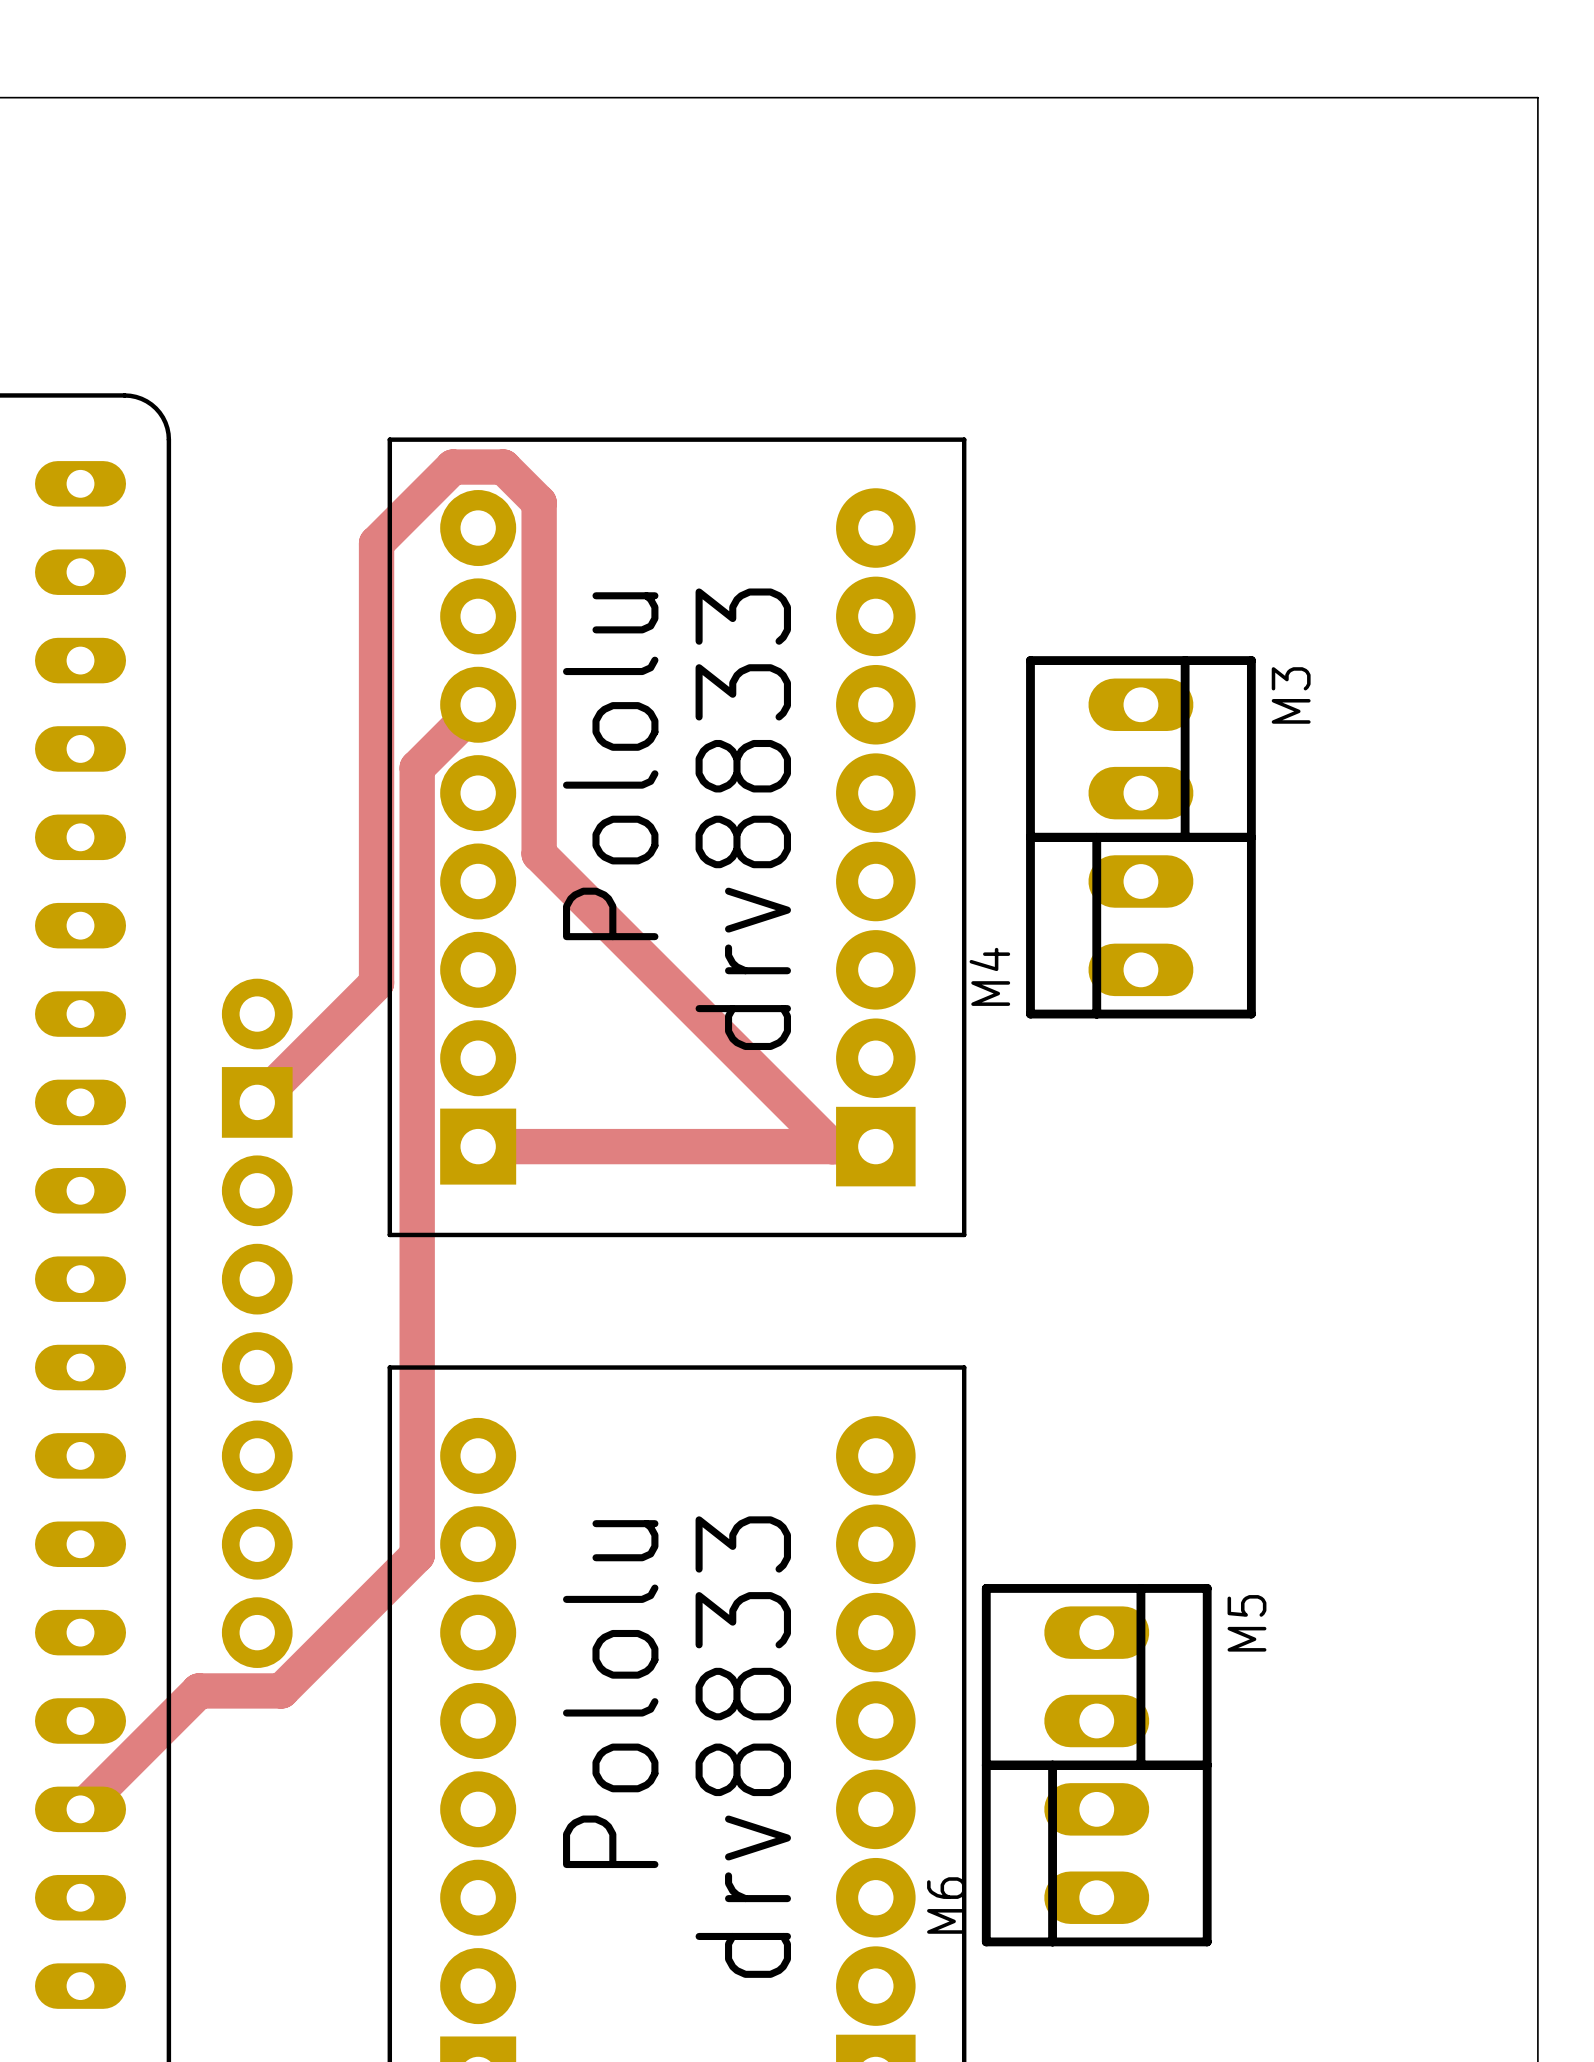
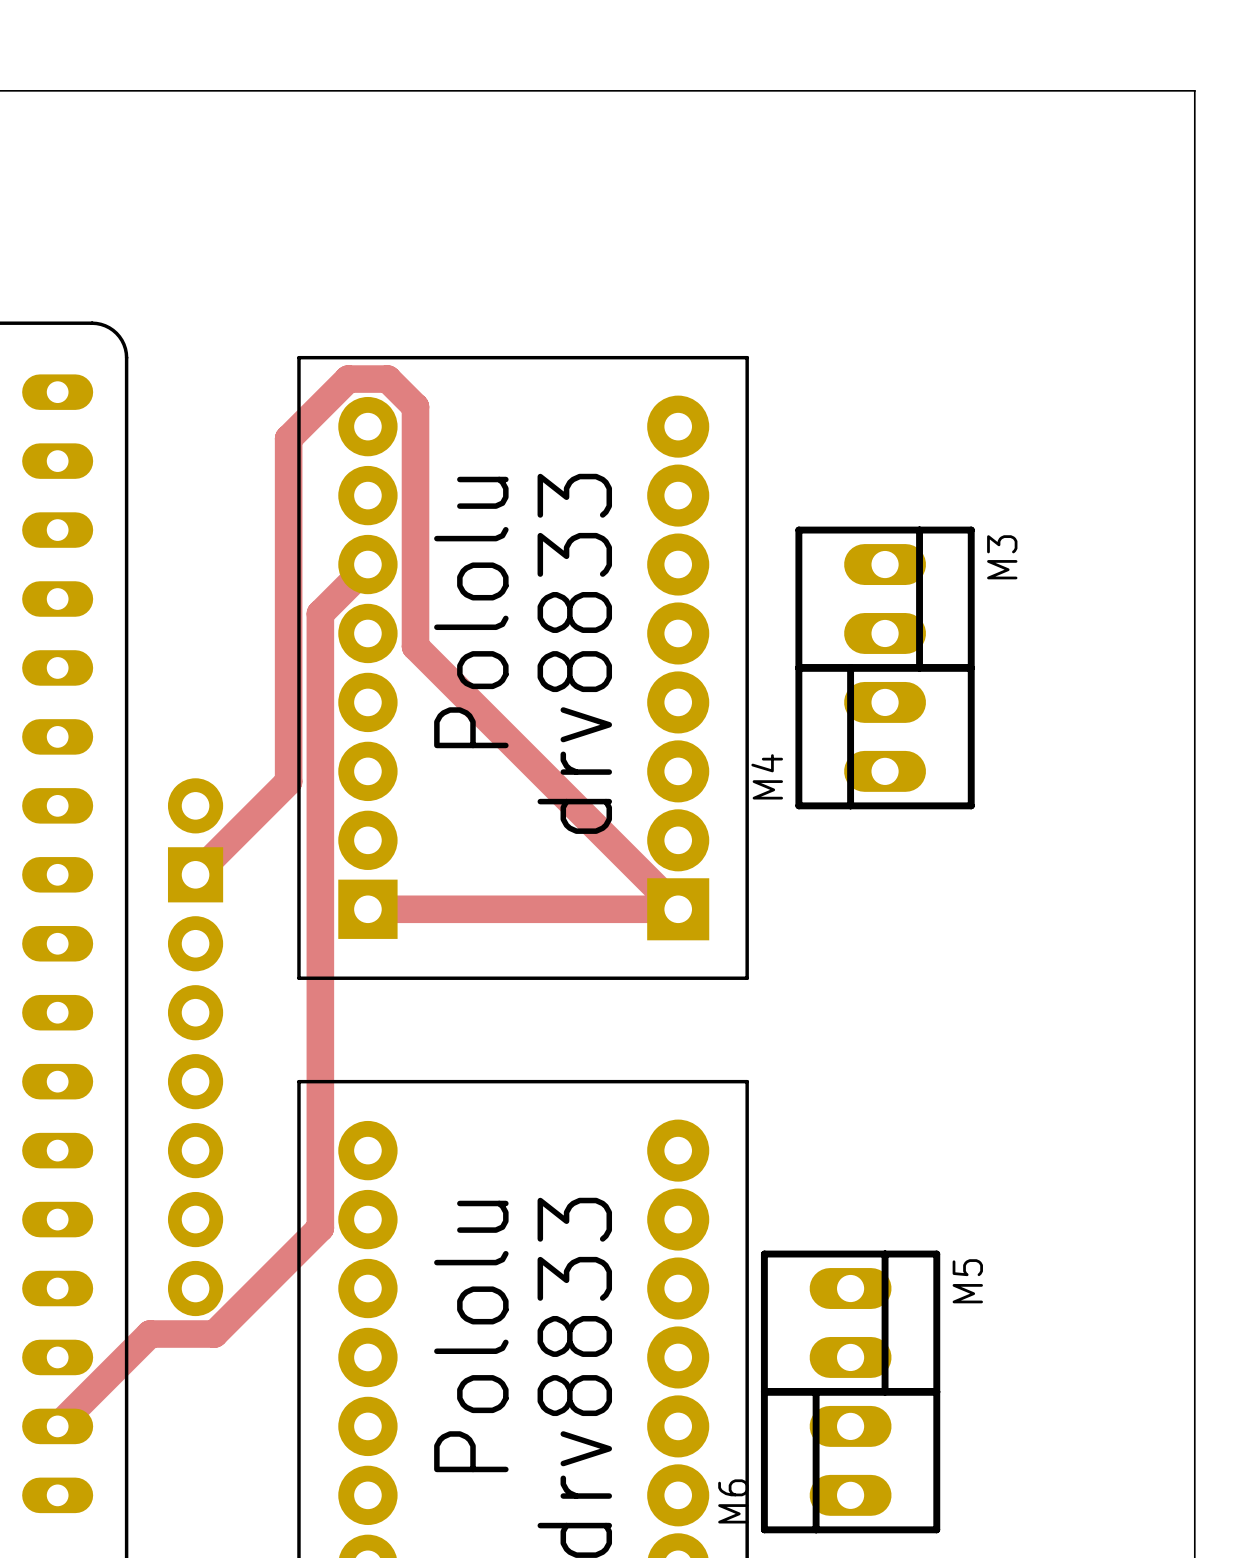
track: (539, 809) (539, 854) (831, 1146) -> (415, 646) (678, 909)

